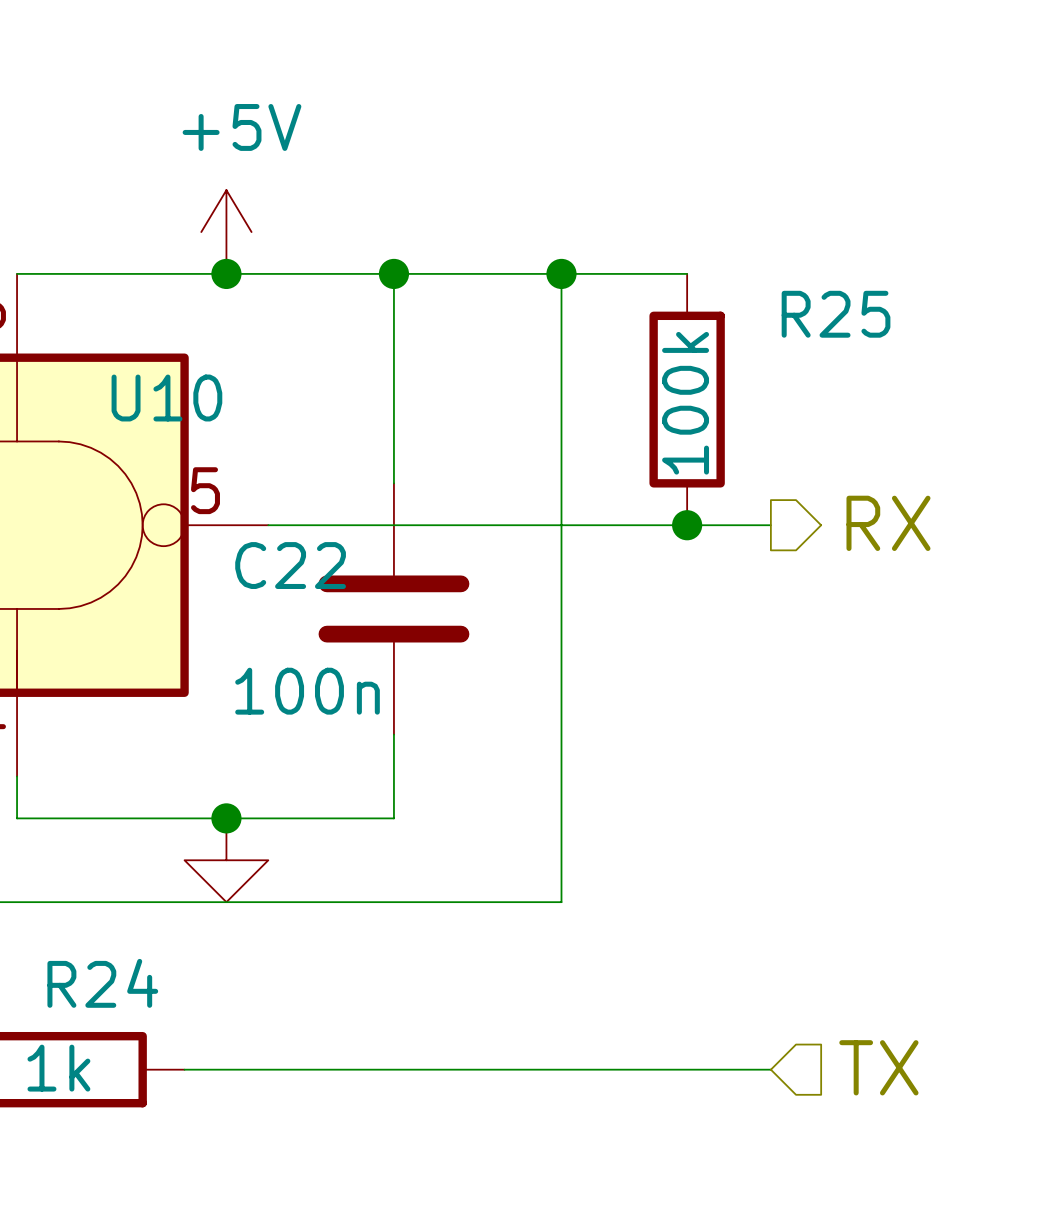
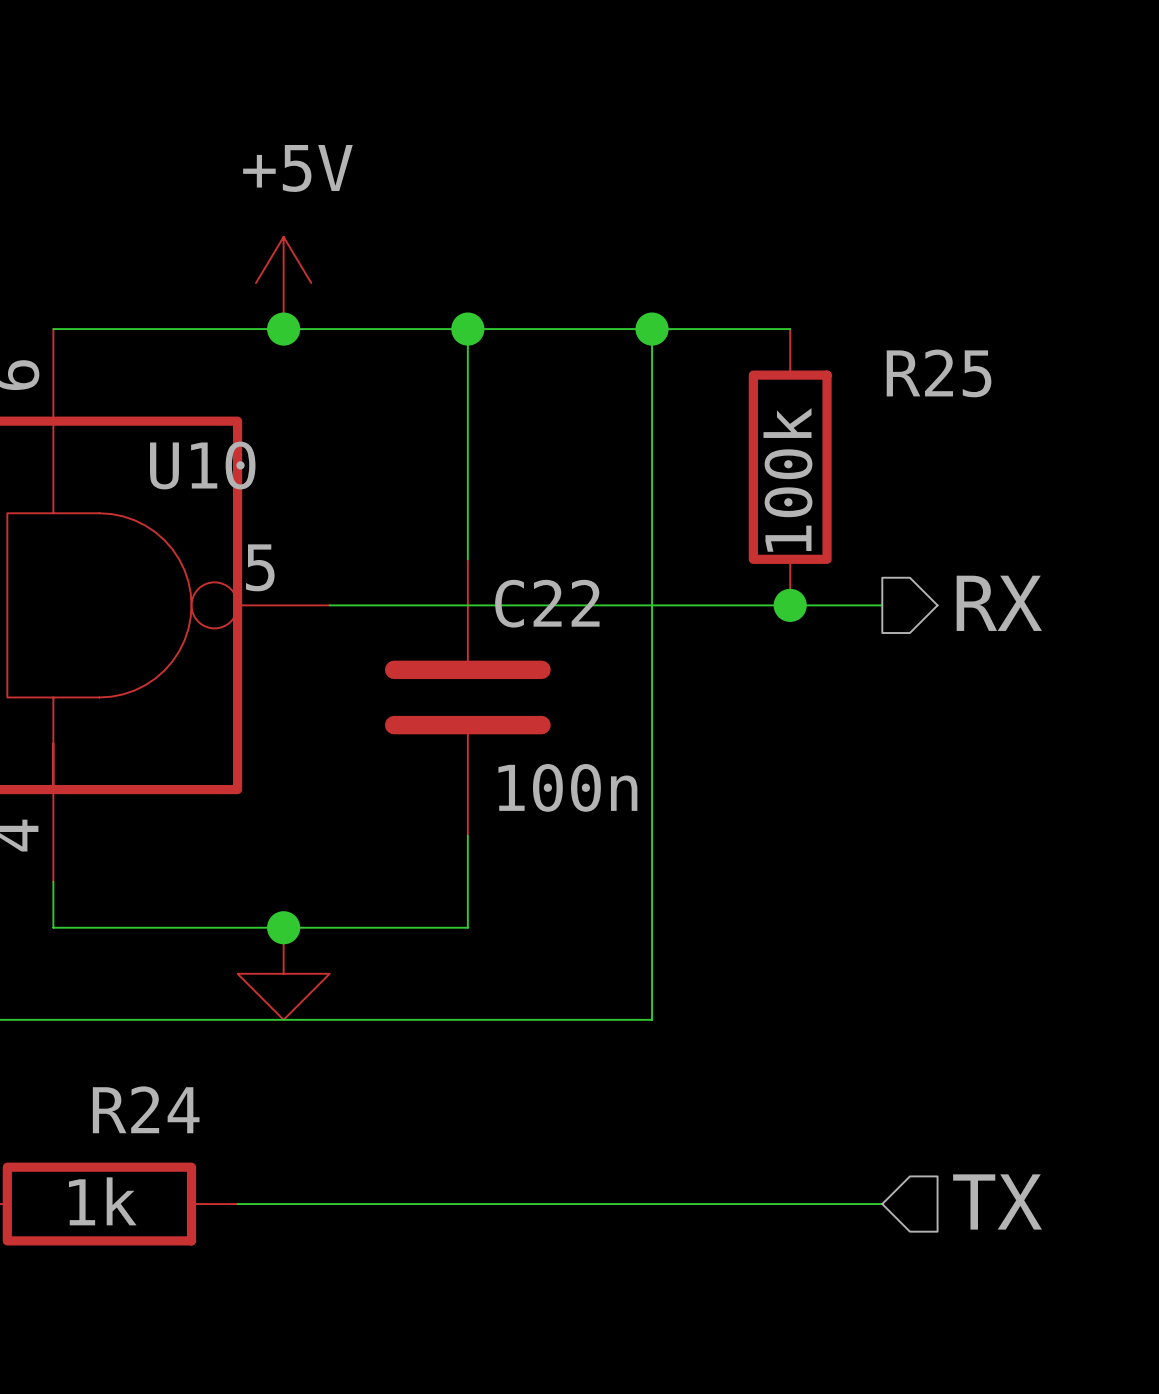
C22 name position: C22 (290, 565) -> C22 (547, 603)
C22 value position: 100n (307, 691) -> 100n (567, 787)

